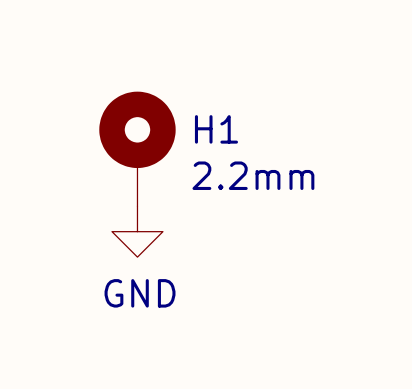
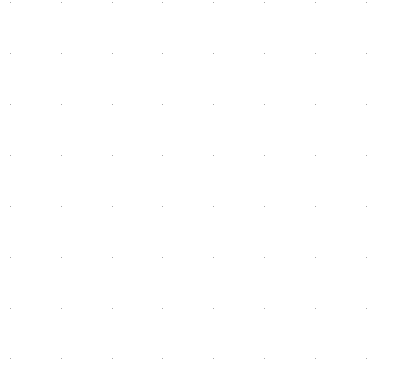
H1: 2.2mm (137, 148) -> none
power symbol: GND (137, 231) -> none

